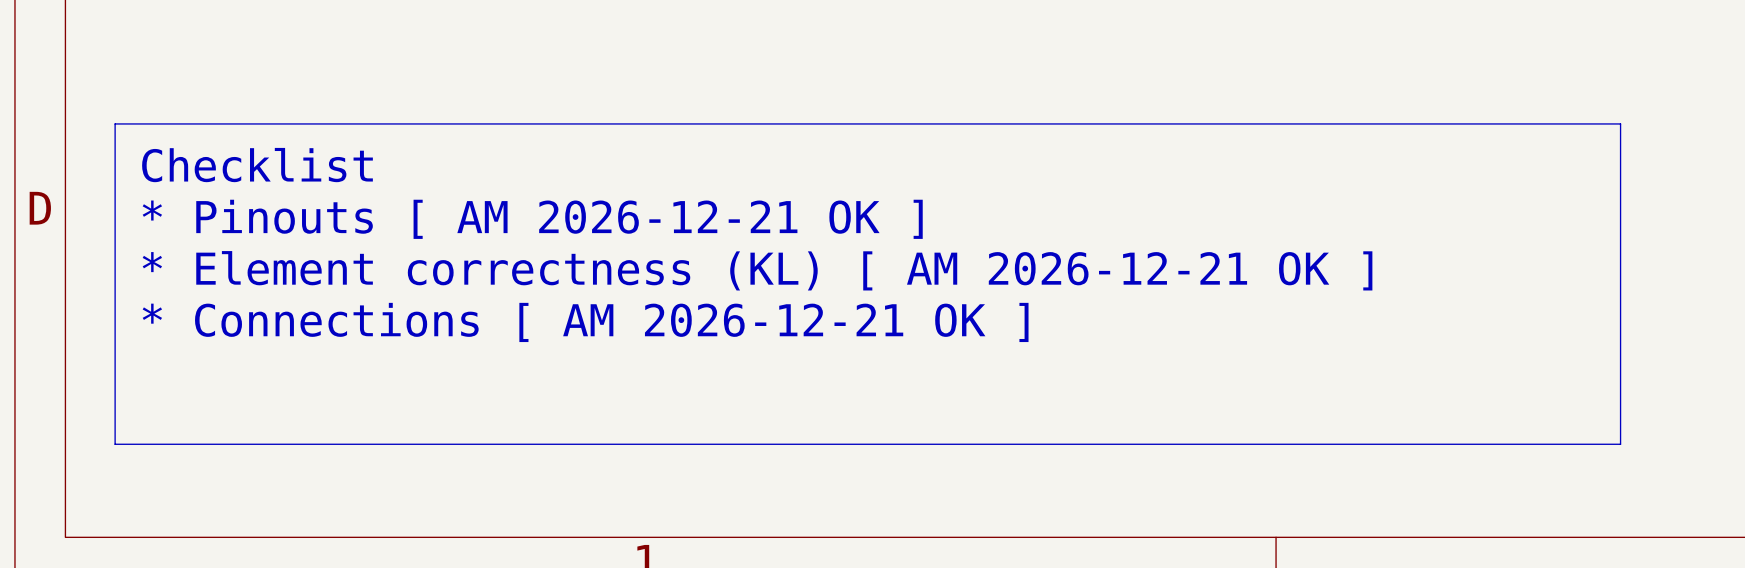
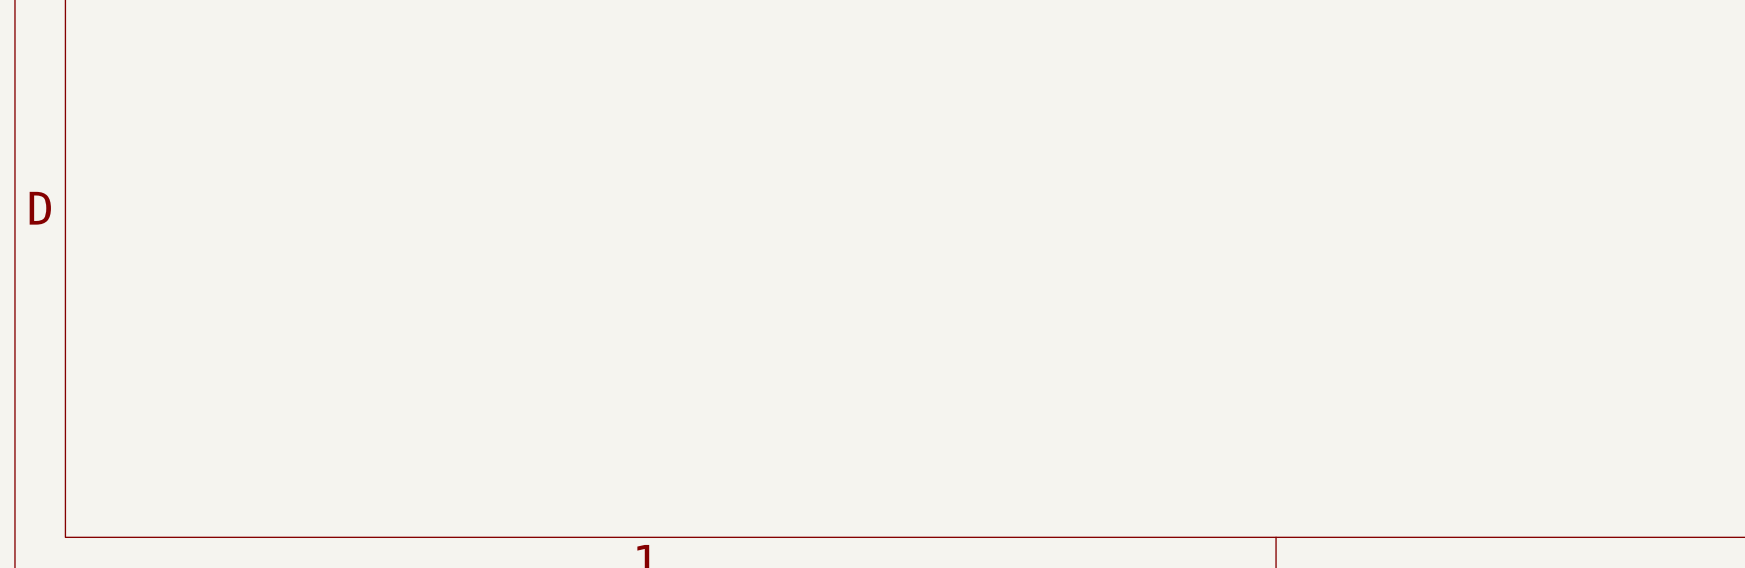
line: (115, 123) (1620, 123) (1620, 444) (115, 444) (115, 123) -> none
text: Checklist (257, 165) -> none
text: * Pinouts [ AM 2026-12-21 OK ] (532, 219) -> none
text: * Element correctness (KL) [ AM 2026-12-21 OK ] (757, 270) -> none
text: * Connections [ AM 2026-12-21 OK ] (585, 322) -> none

